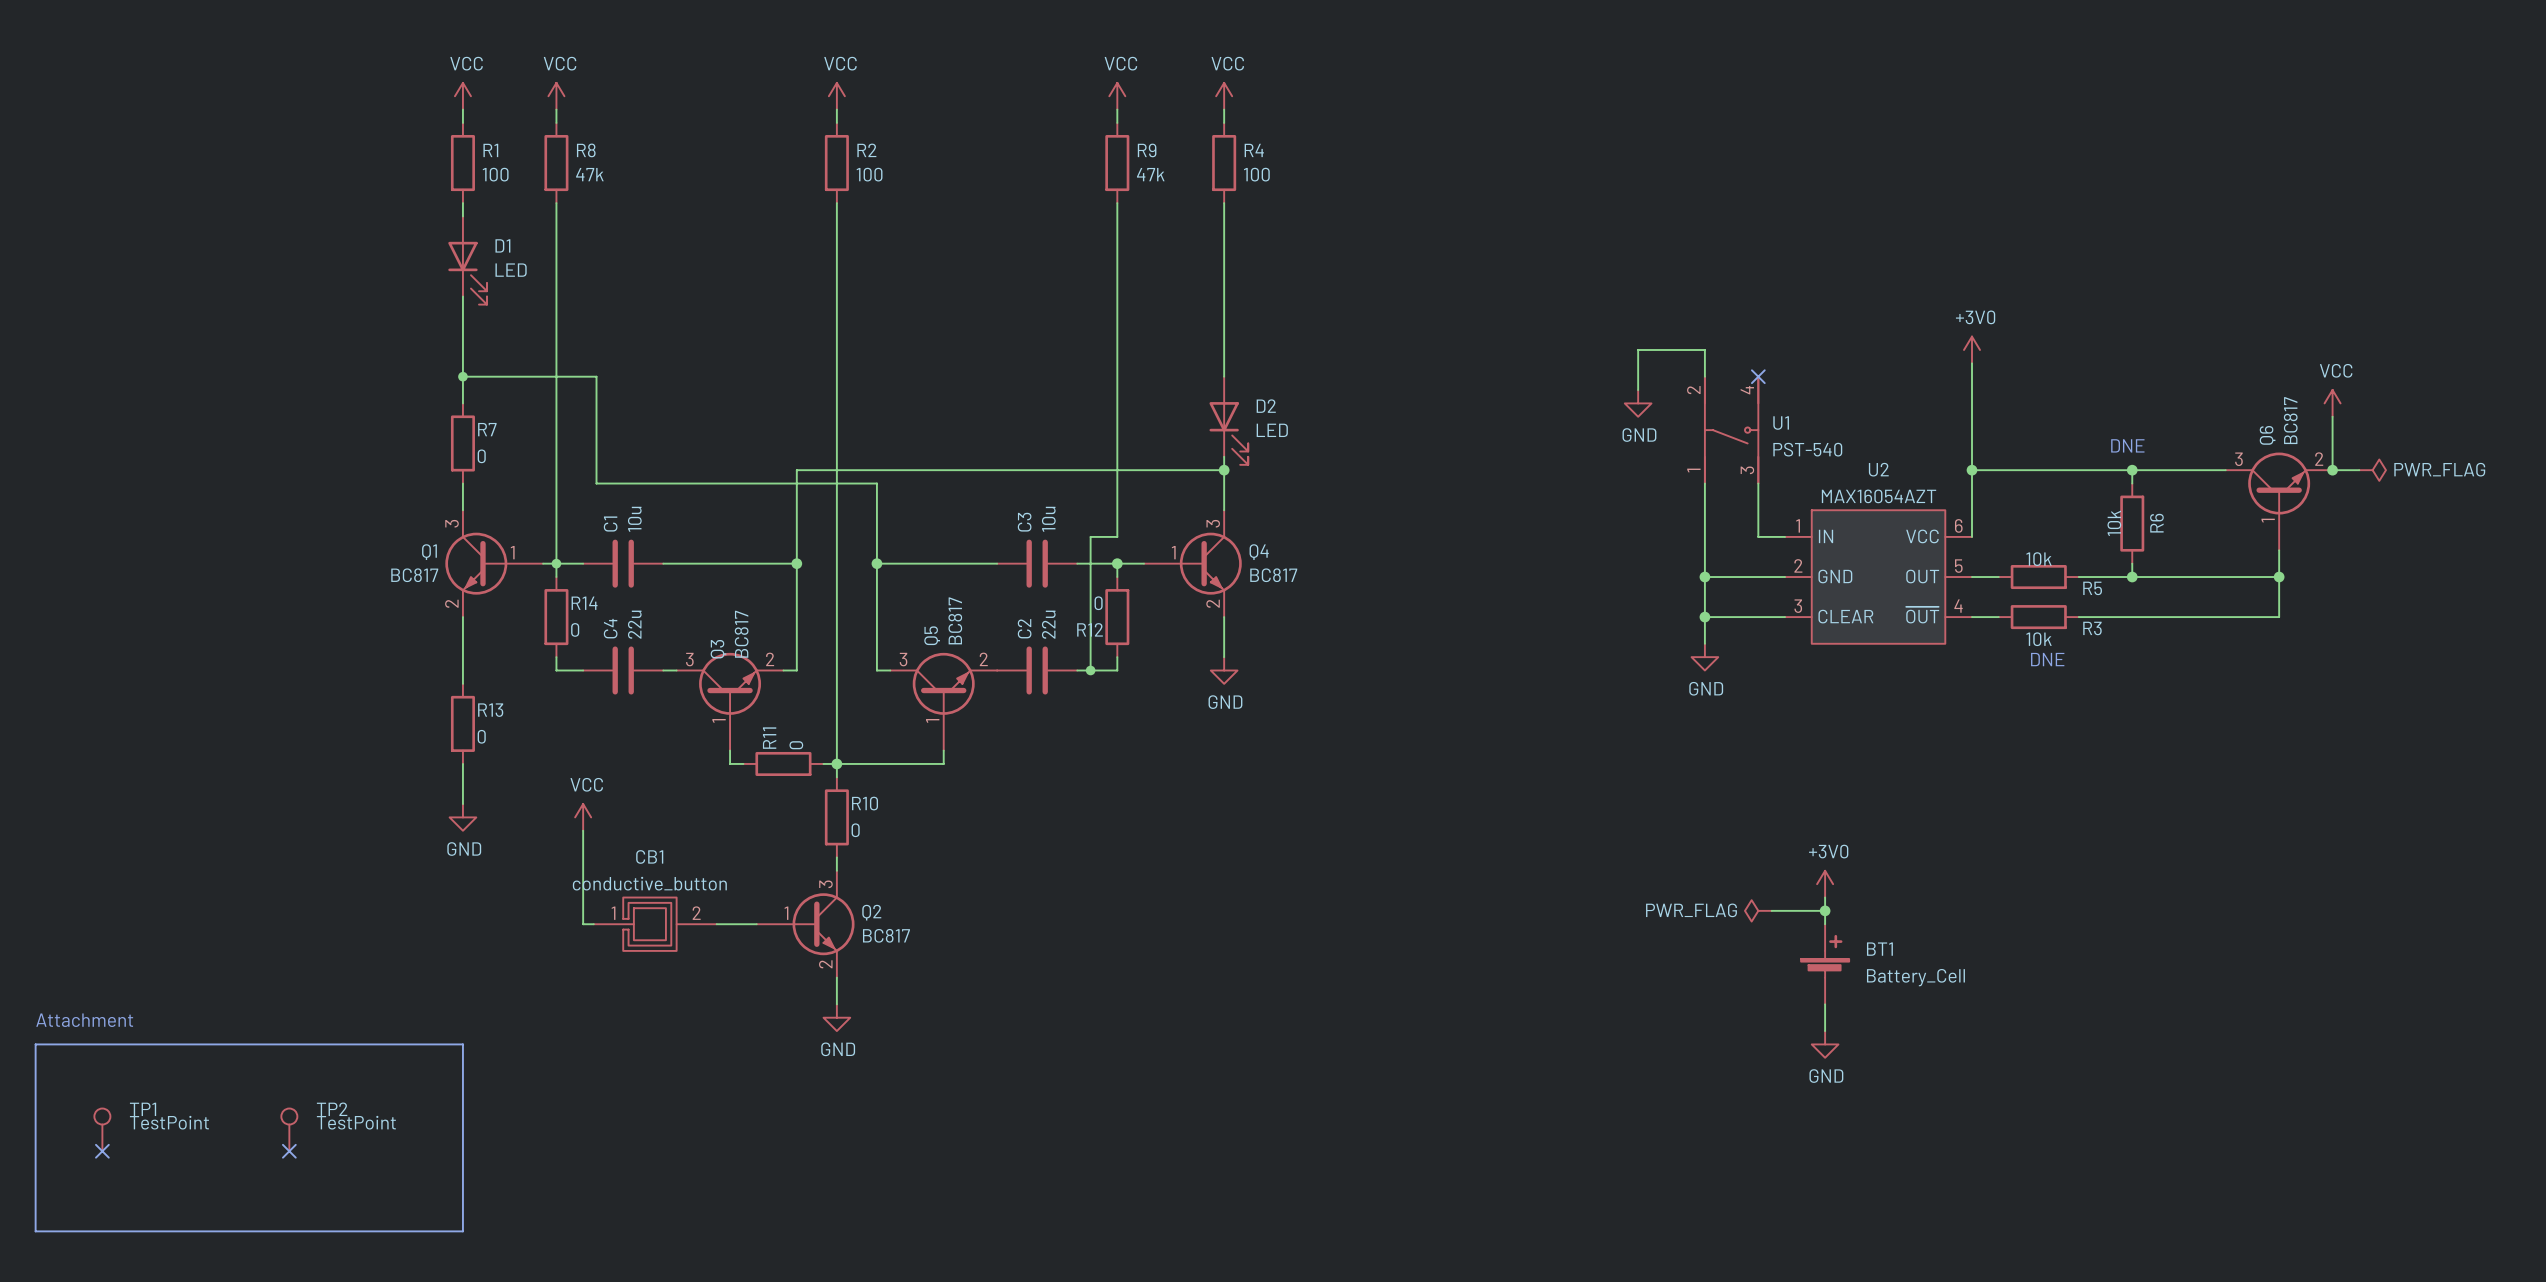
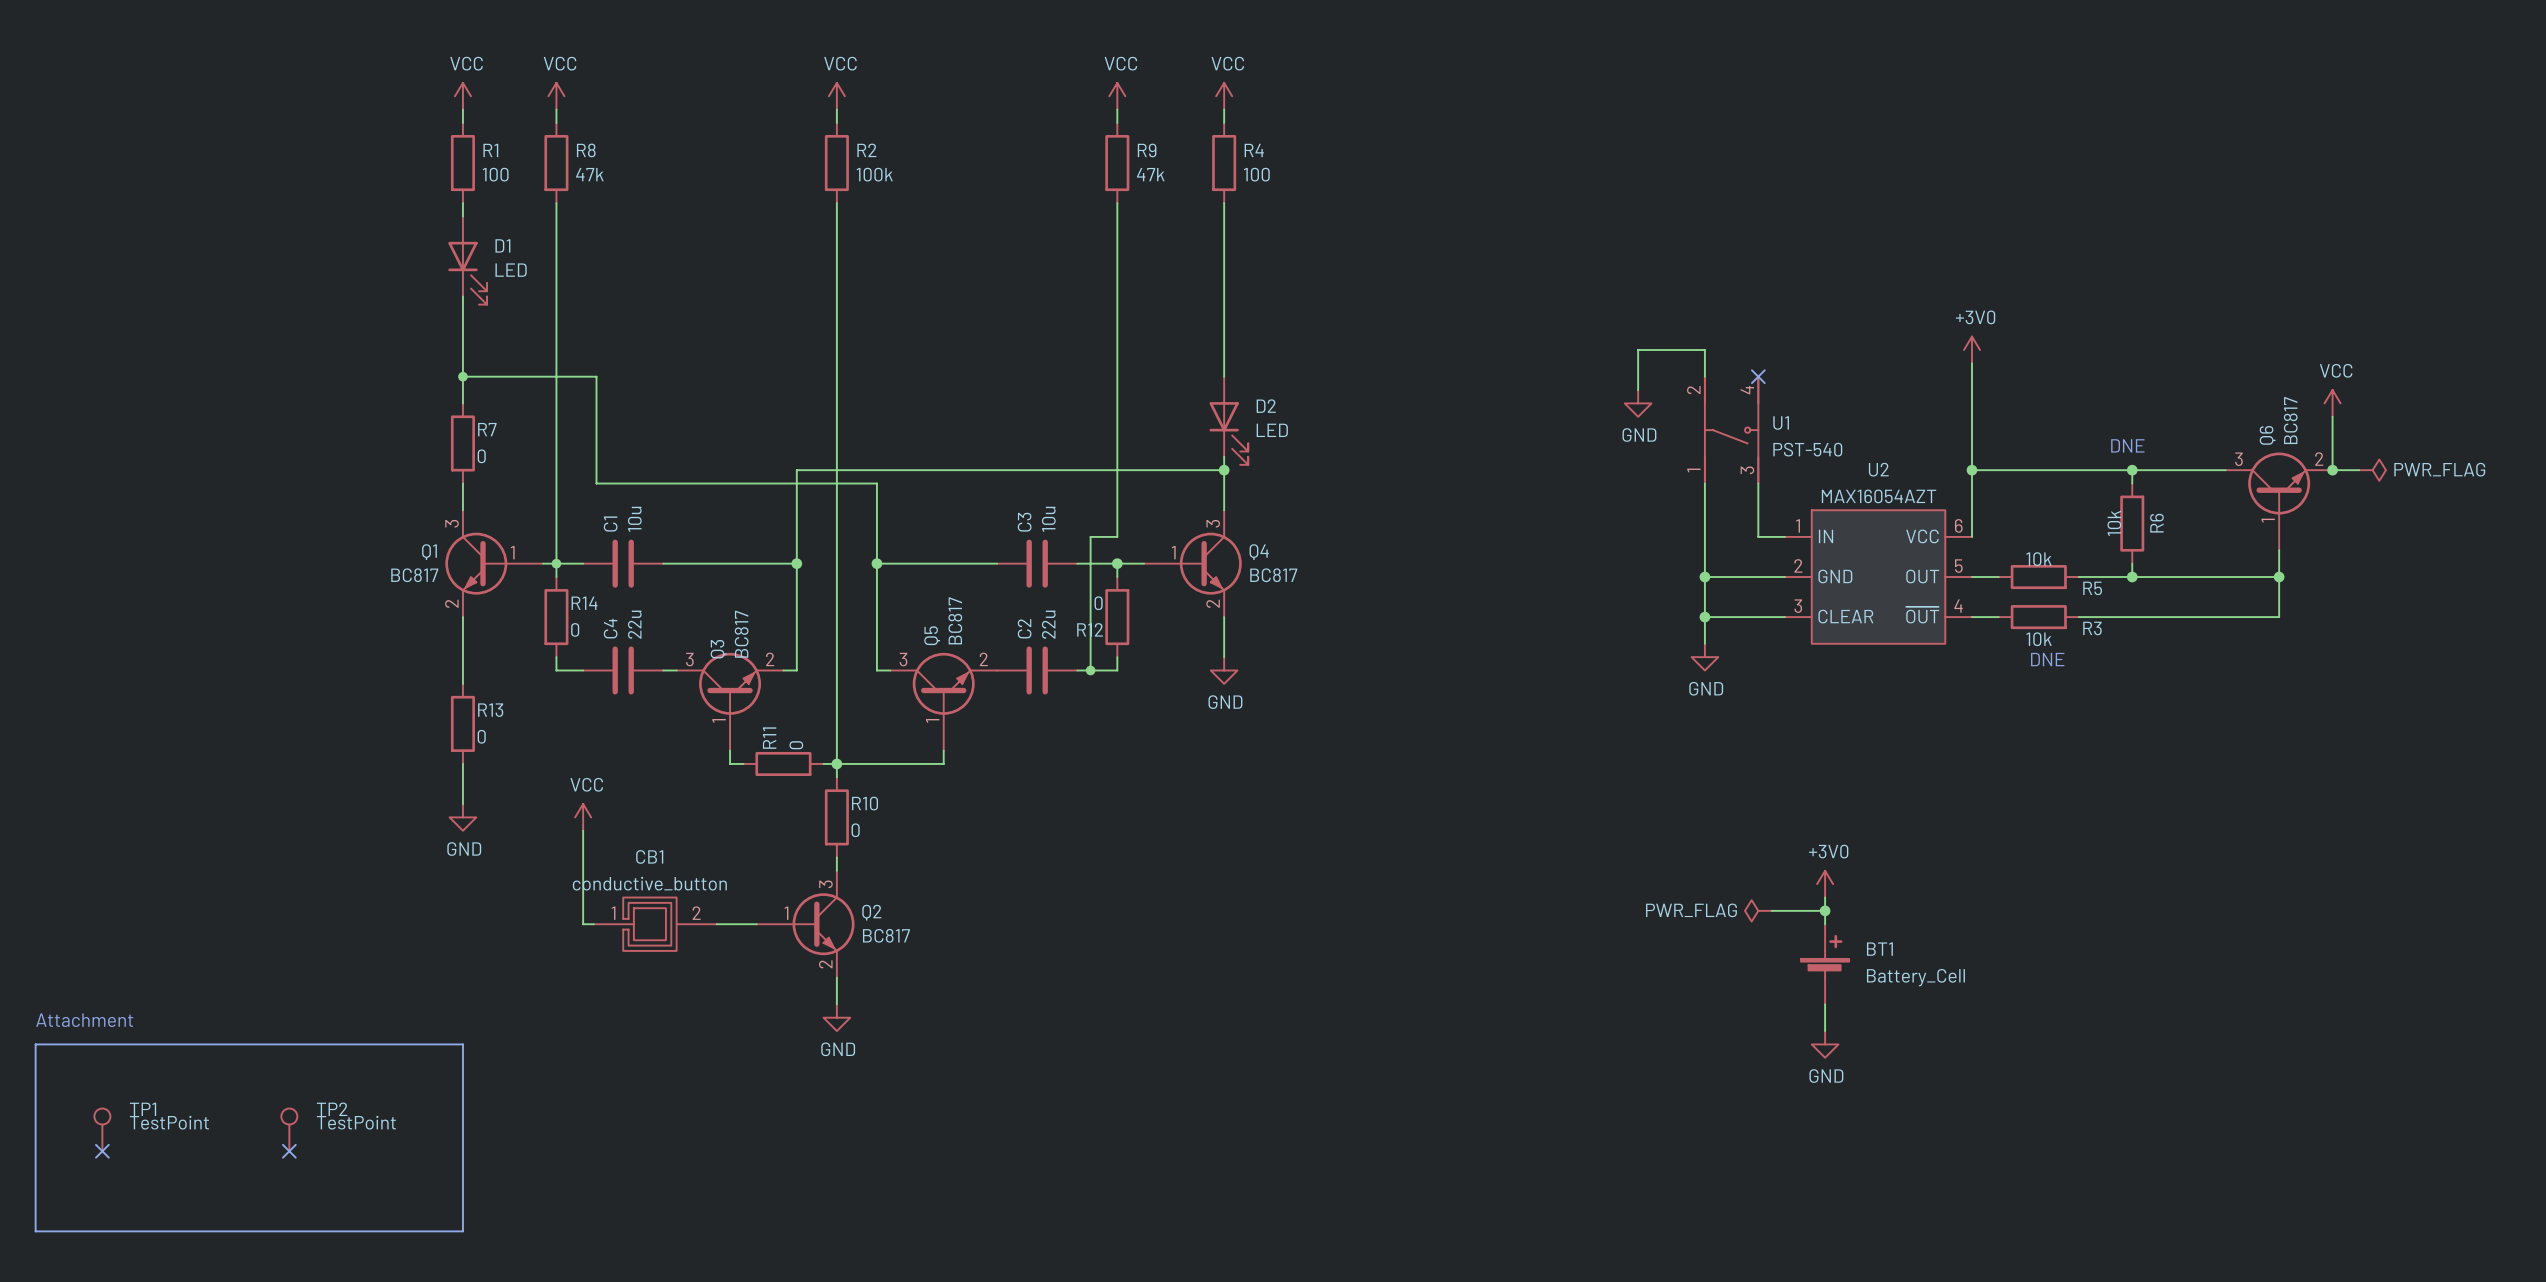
R2 value: 100 (869, 174) -> 100k (874, 174)

